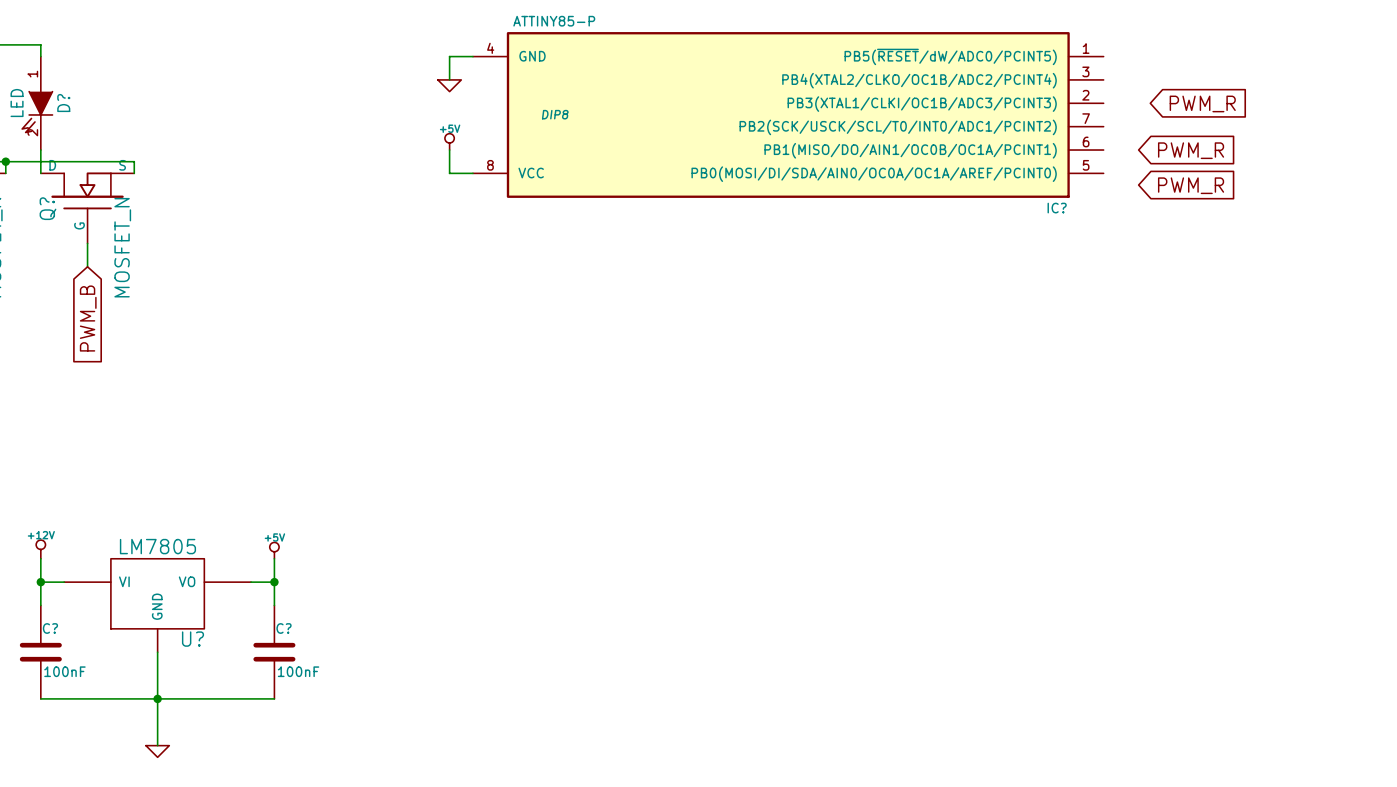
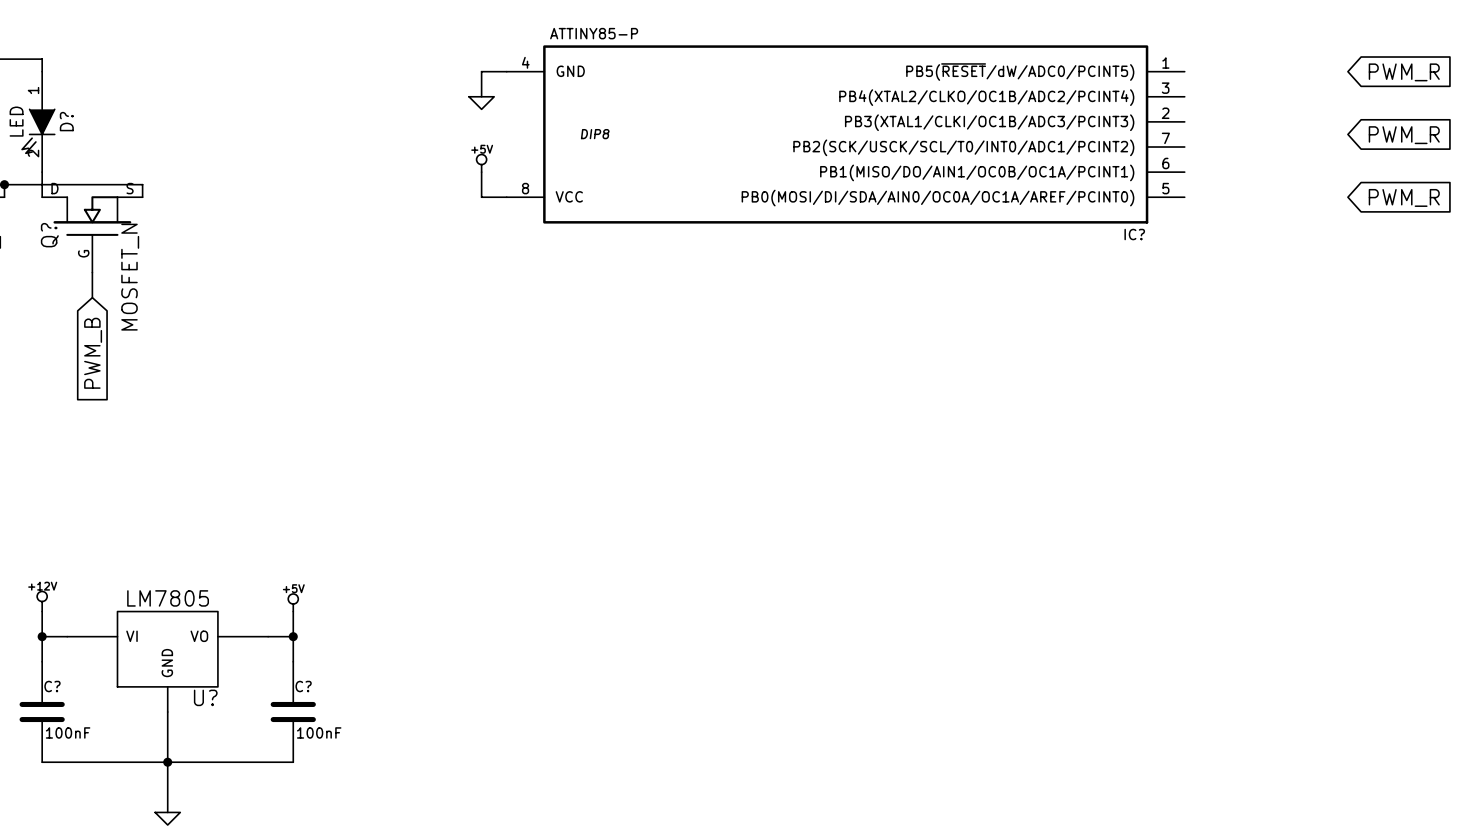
global label: none -> PWM_R (1404, 72)
global label position: PWM_R (1202, 103) -> PWM_R (1404, 135)
global label: PWM_R (1191, 150) -> none
global label: none -> PWM_R (1404, 197)
global label: PWM_R (1191, 185) -> none

